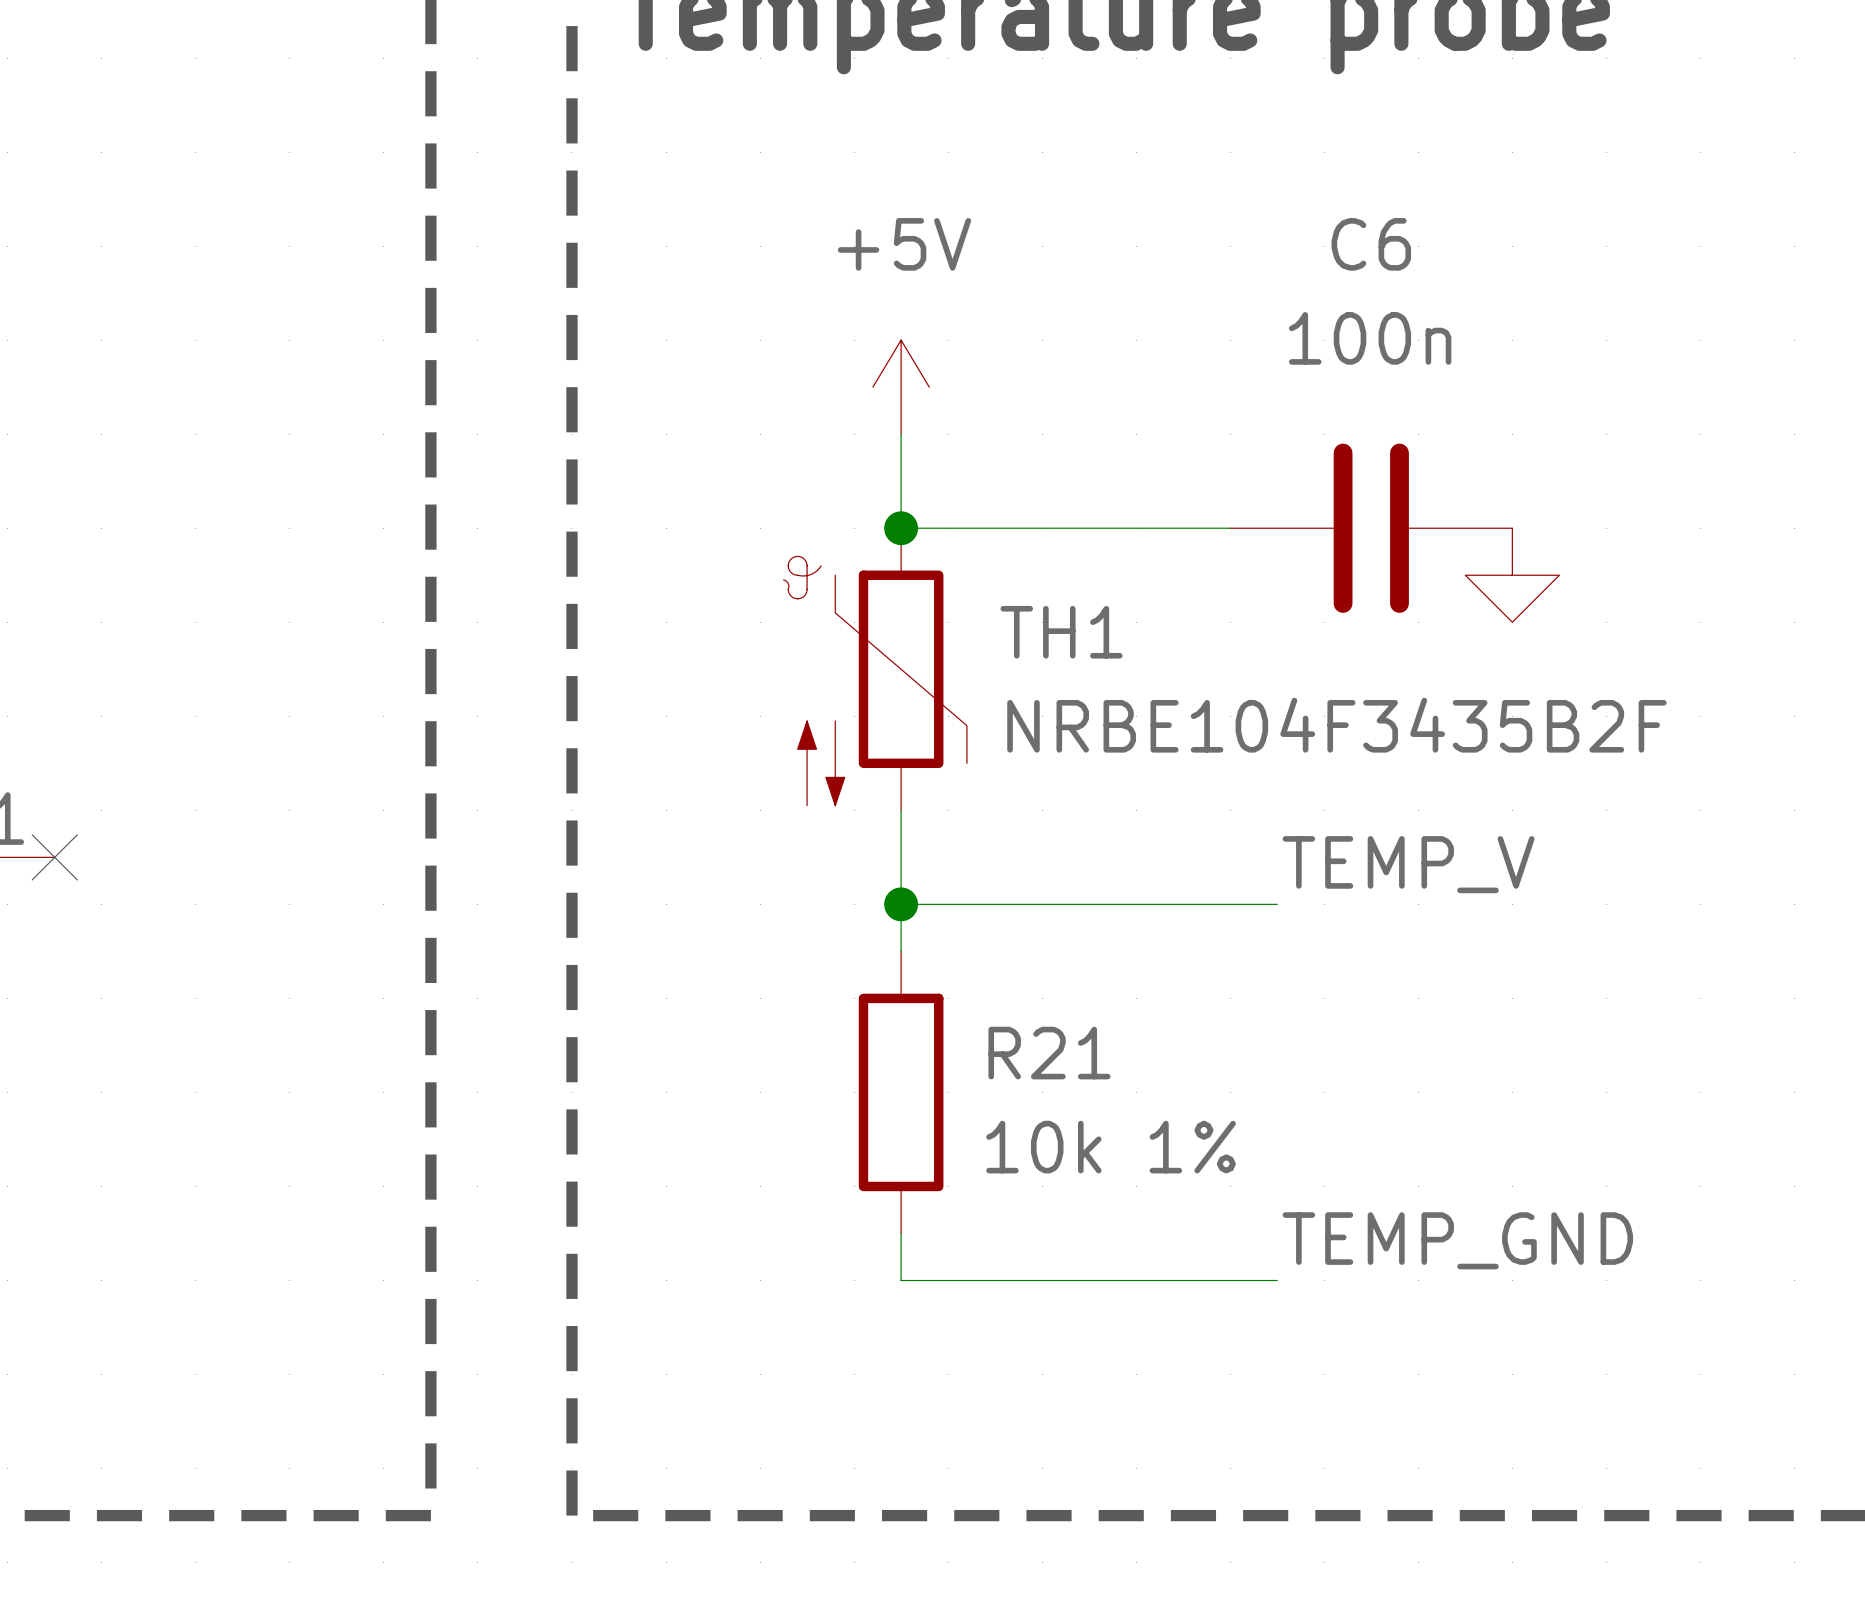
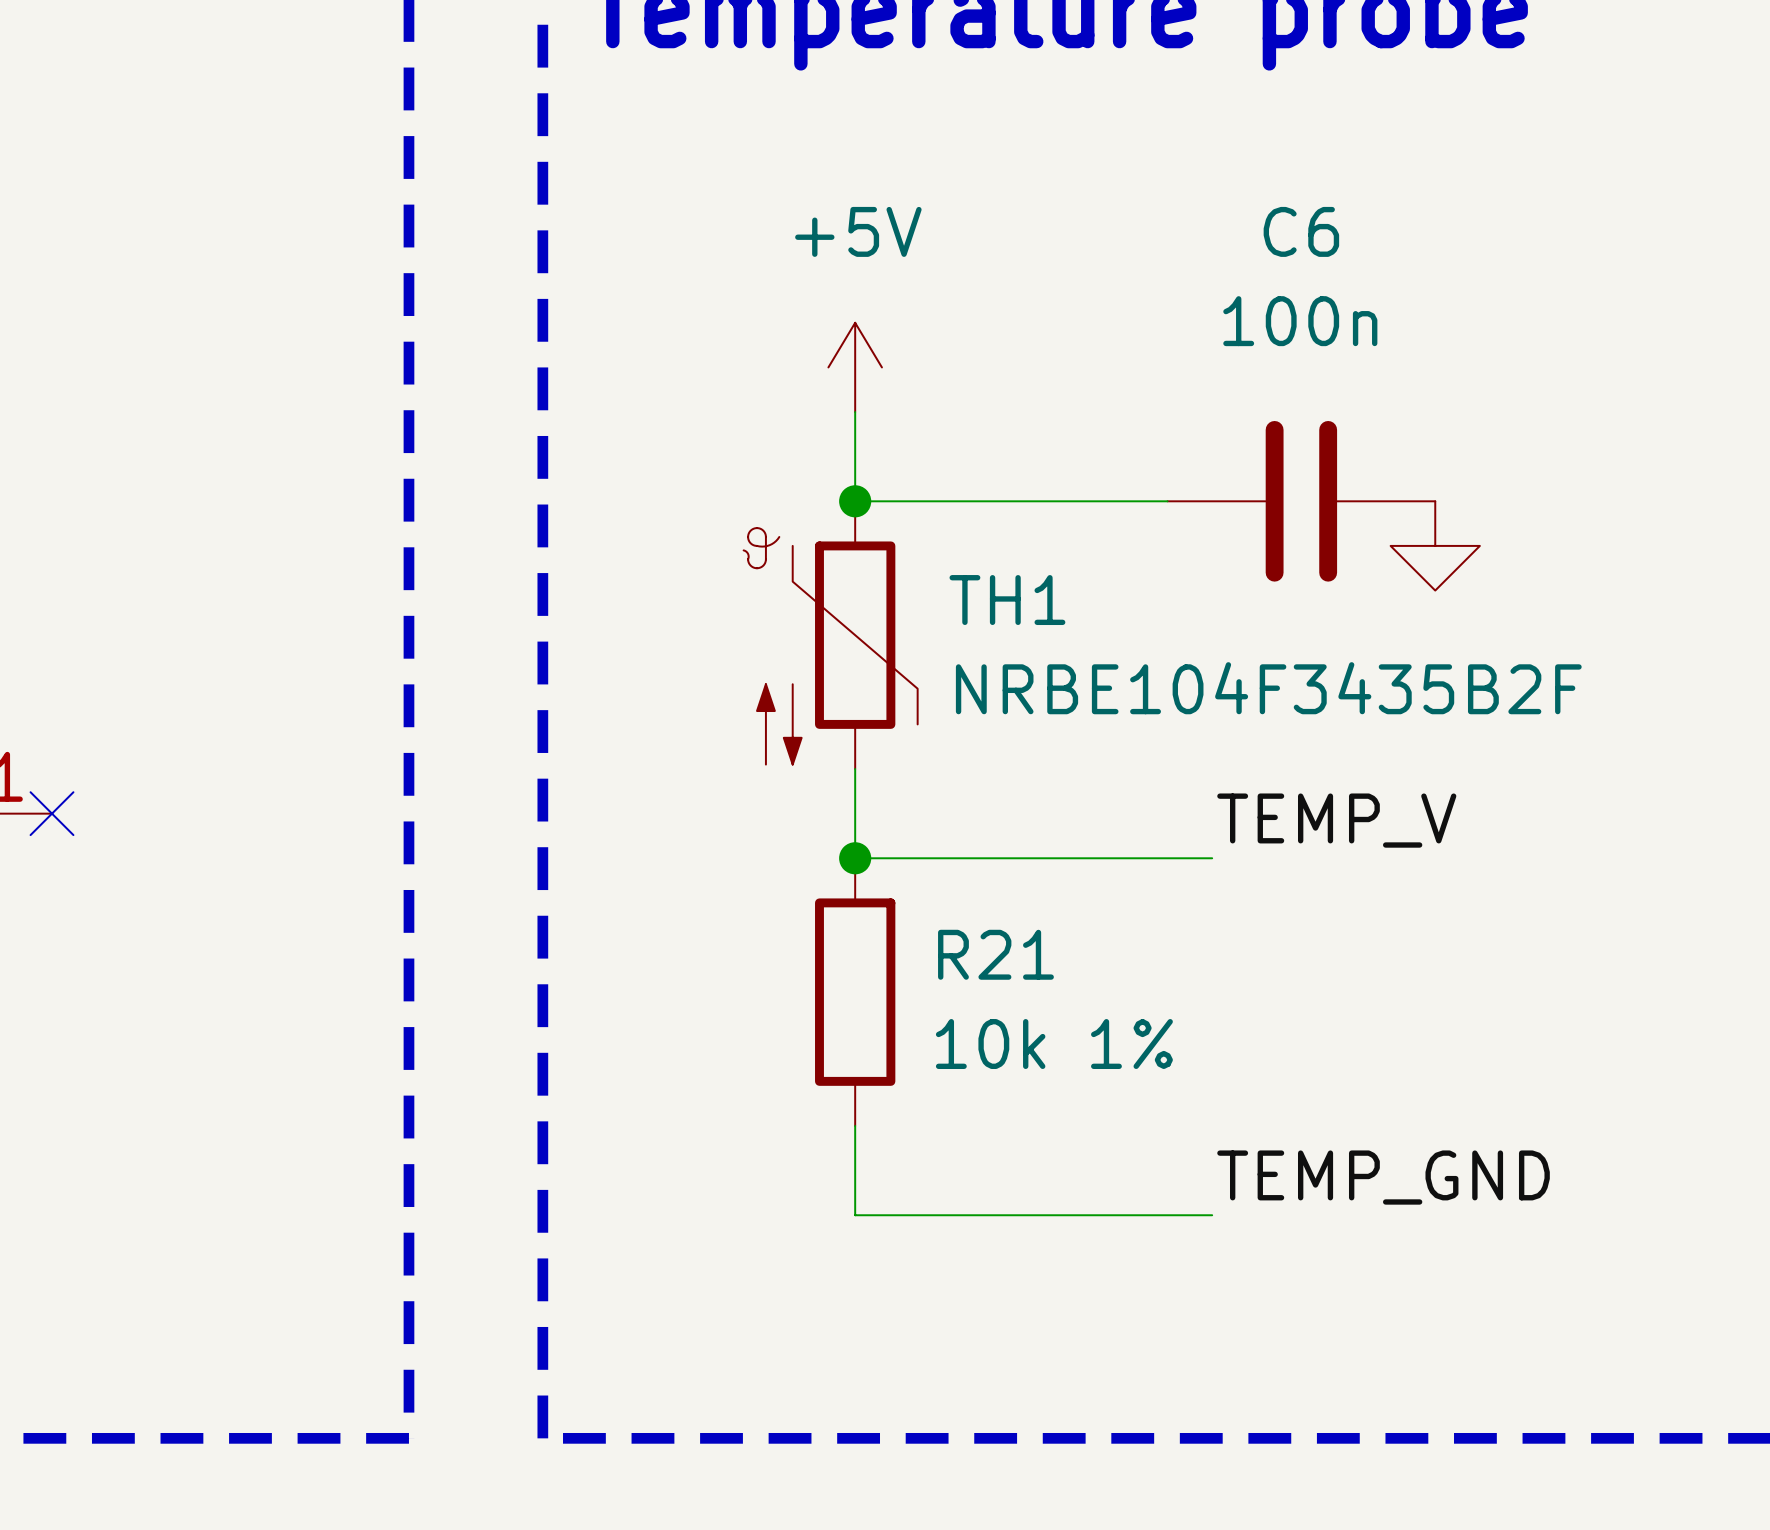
R21 position: (901, 1092) -> (855, 992)

